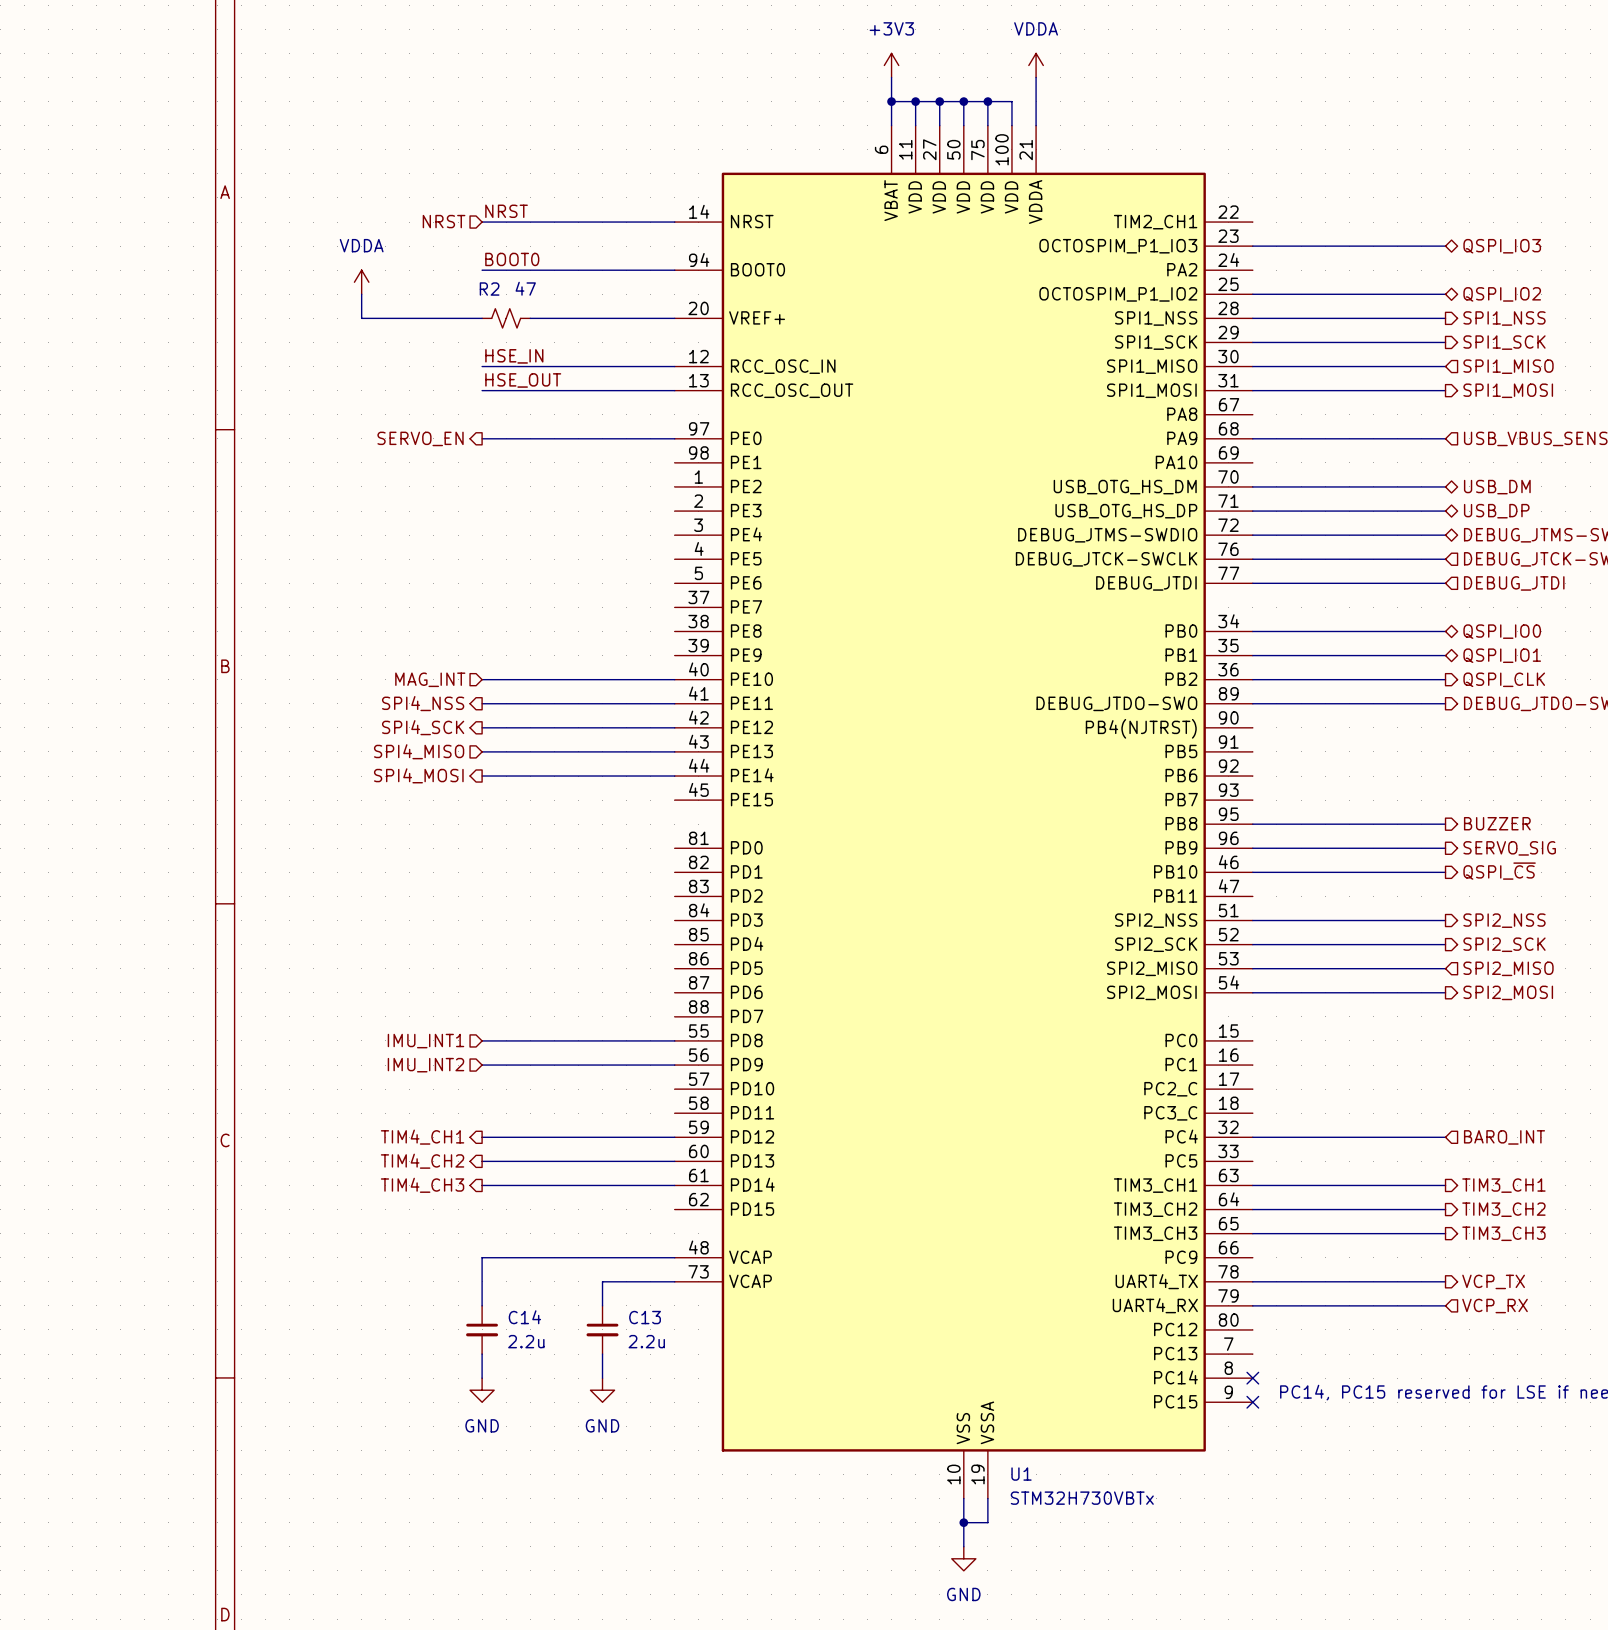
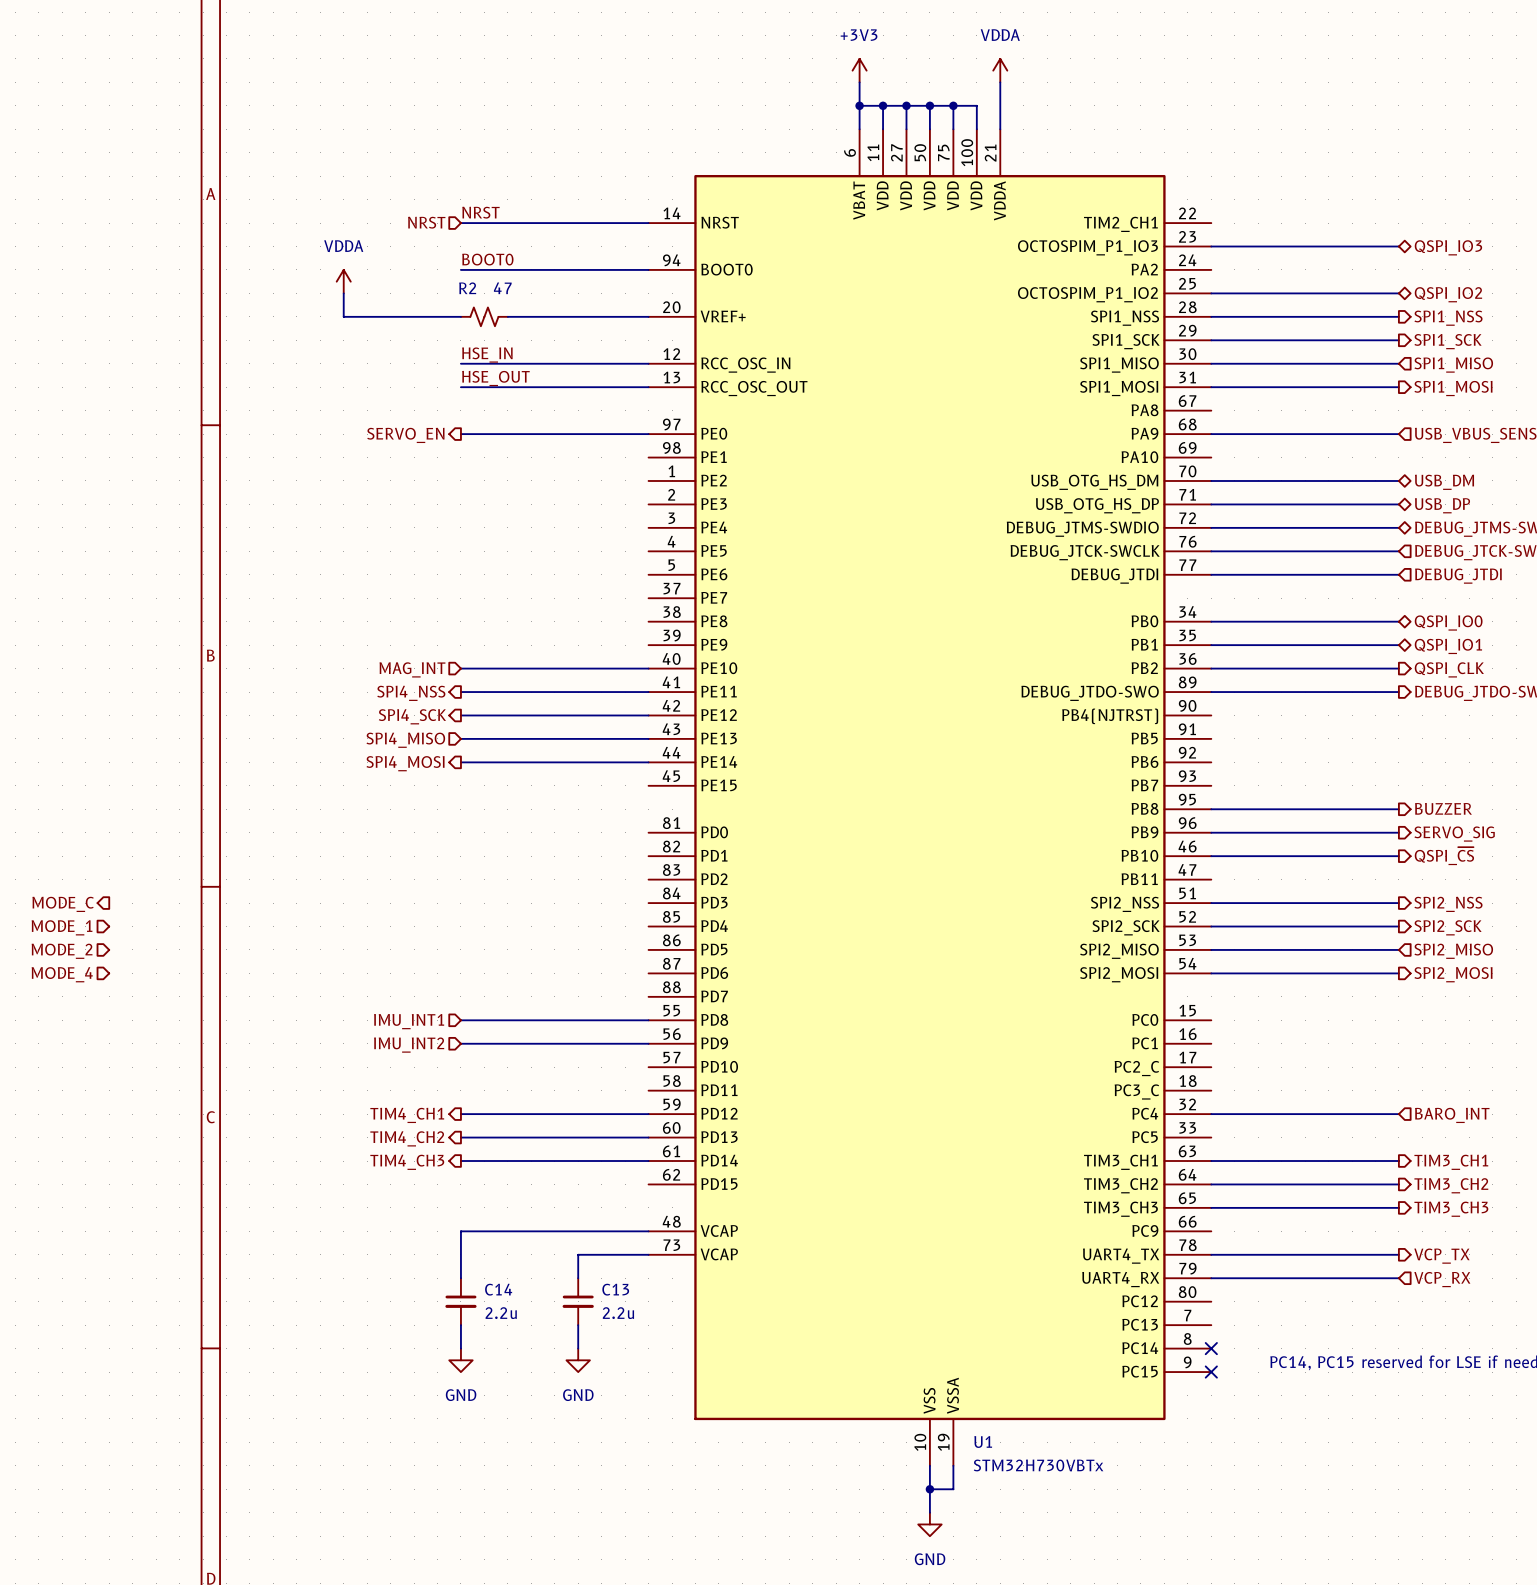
hierarchical label: none -> MODE_C (63, 904)
hierarchical label: none -> MODE_1 (62, 927)
hierarchical label: none -> MODE_2 (62, 951)
hierarchical label: none -> MODE_4 (62, 974)

